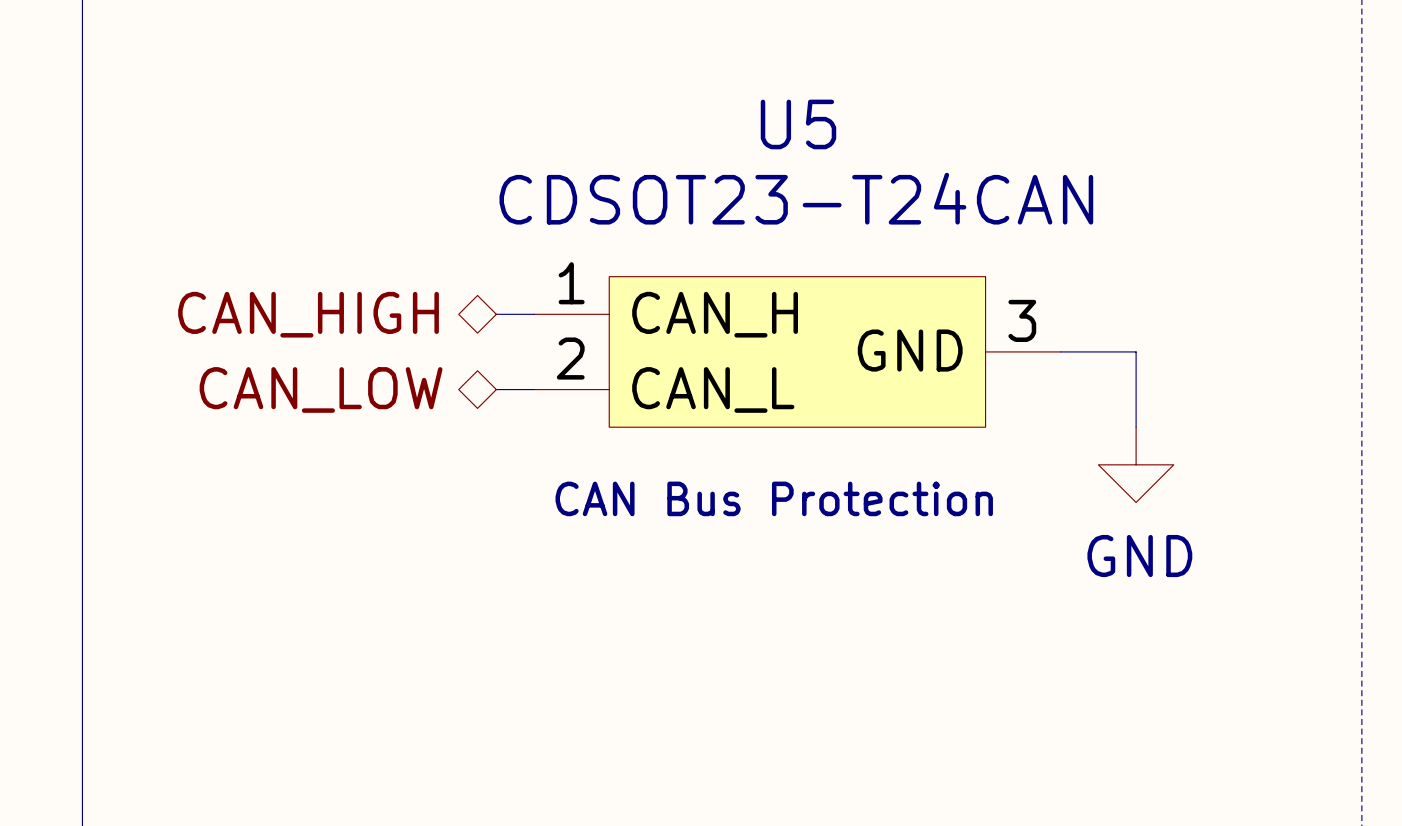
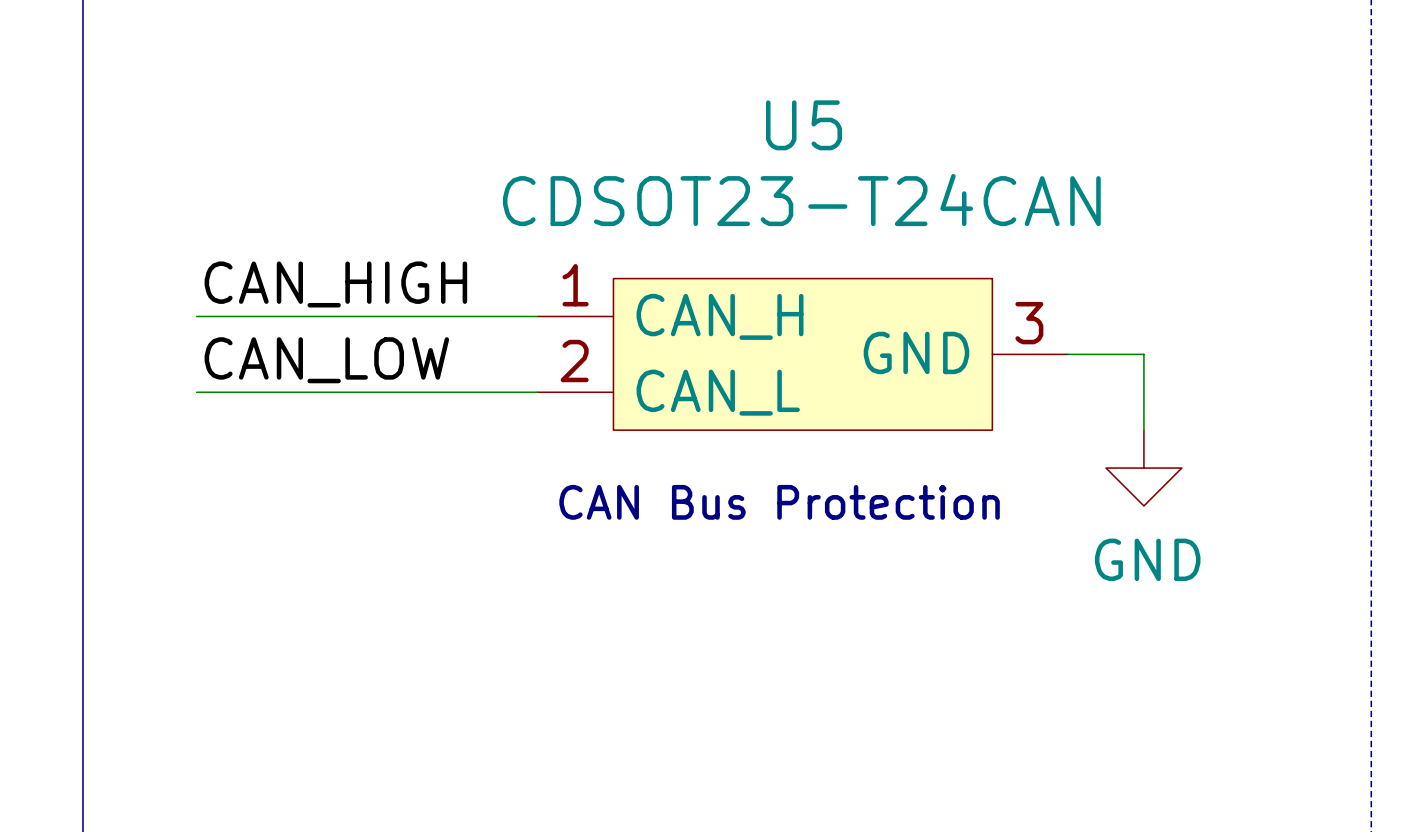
label: none -> CAN_HIGH (335, 284)
wire: none -> (196, 316) (499, 316)
hierarchical label: CAN_HIGH (308, 314) -> none
label: none -> CAN_LOW (326, 360)
wire: none -> (196, 392) (499, 392)
hierarchical label: CAN_LOW (321, 389) -> none

